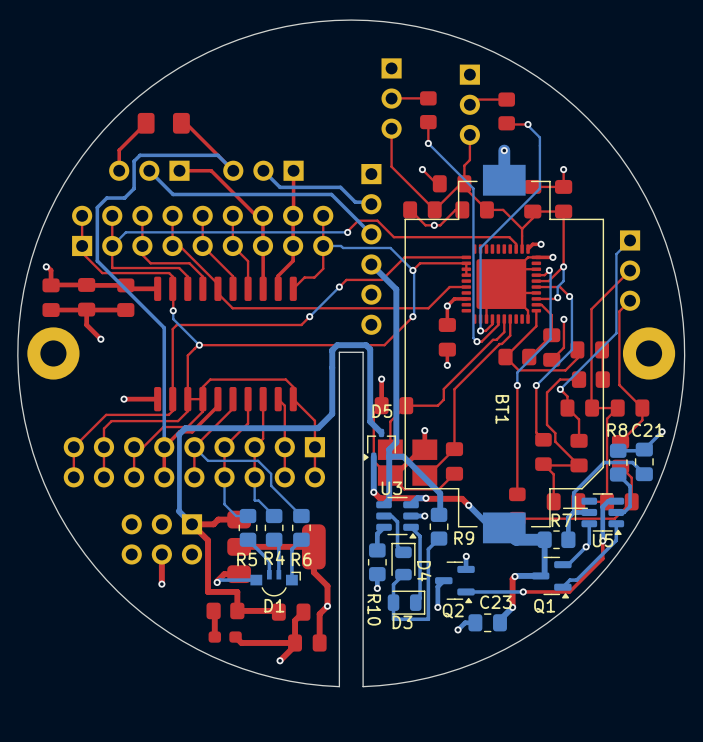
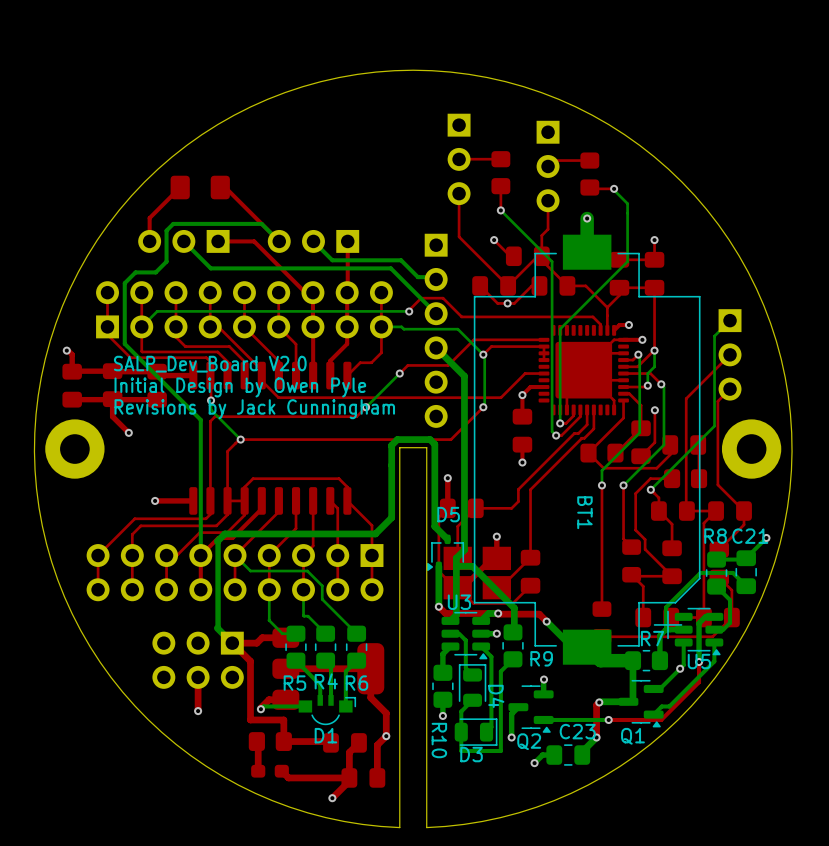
text: none -> SALP_Dev_Board V2.0 (210, 364)
text: none -> Initial Design by Owen Pyle (240, 387)
text: none -> Revisions by Jack Cunningham (254, 409)

